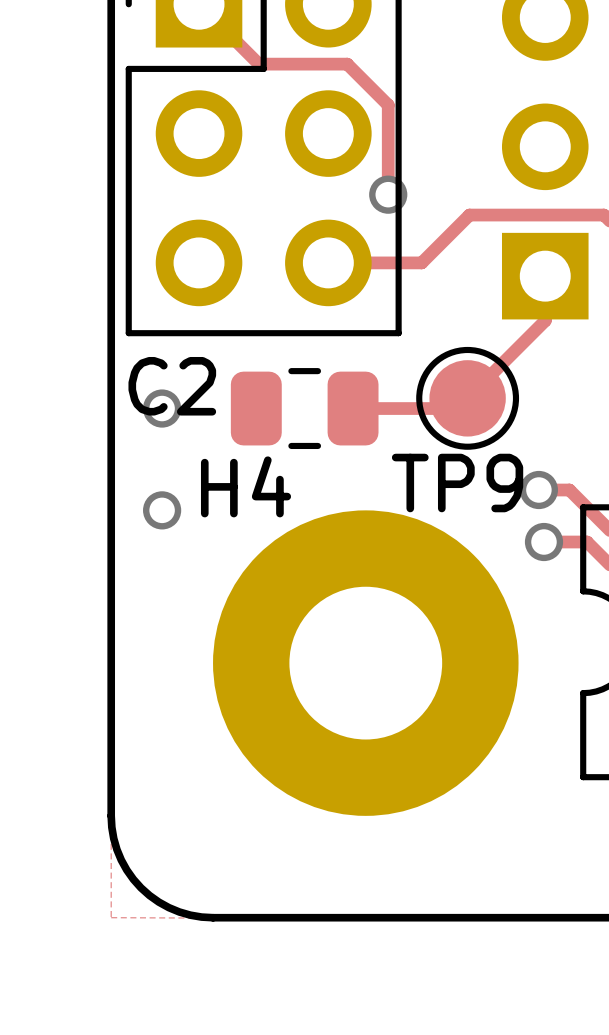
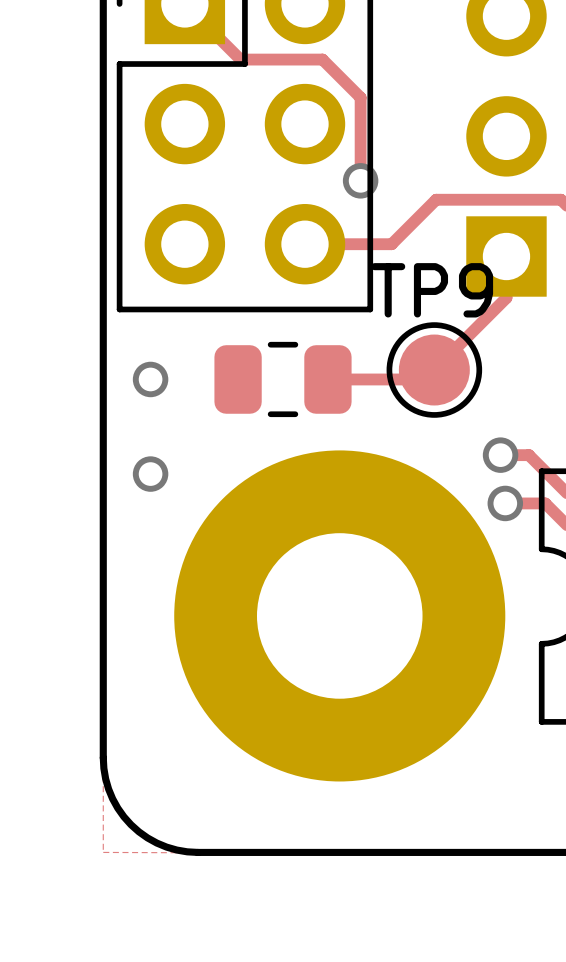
C2 name: C2 (172, 386) -> none
TP9 name position: TP9 (457, 483) -> TP9 (432, 290)
H4: (365, 663) -> none
part: none -> (339, 615)

